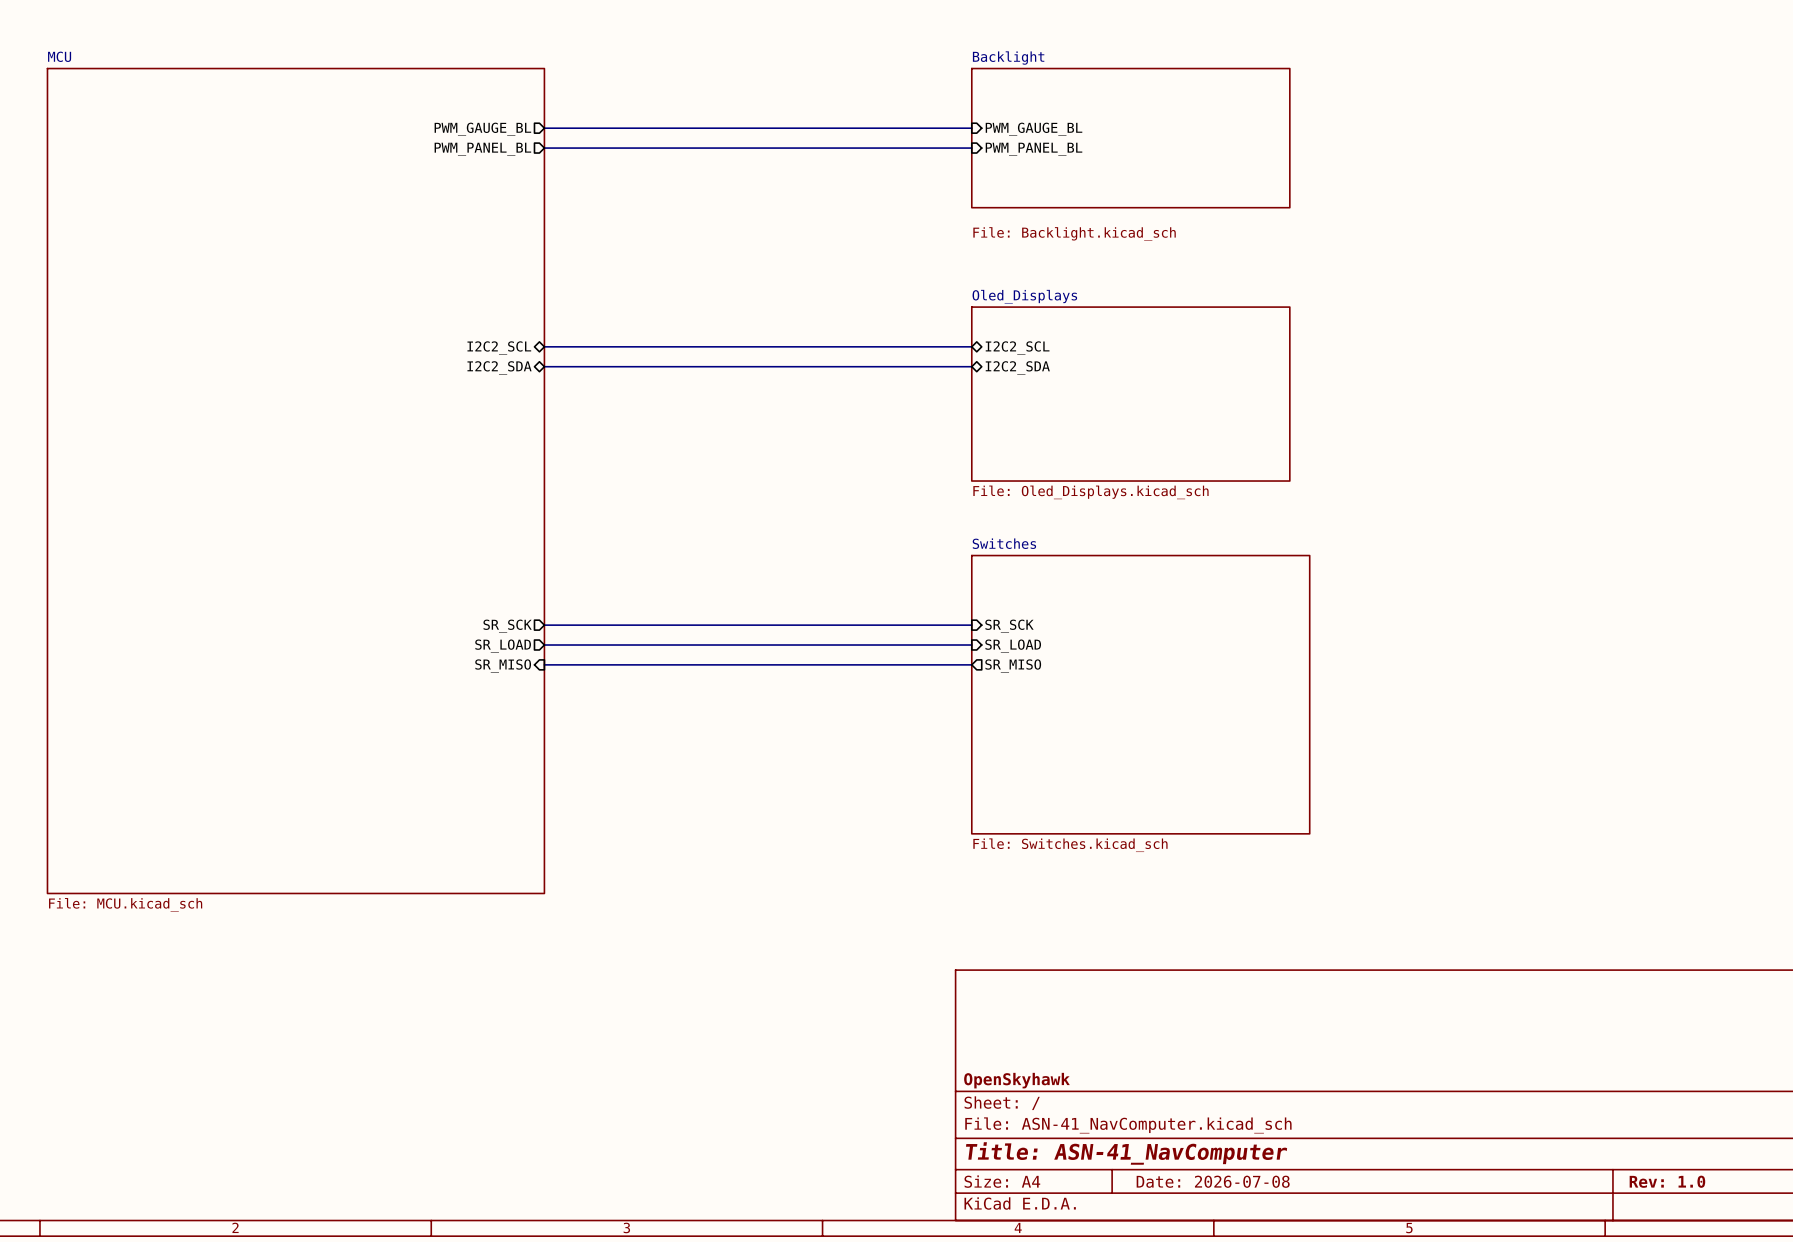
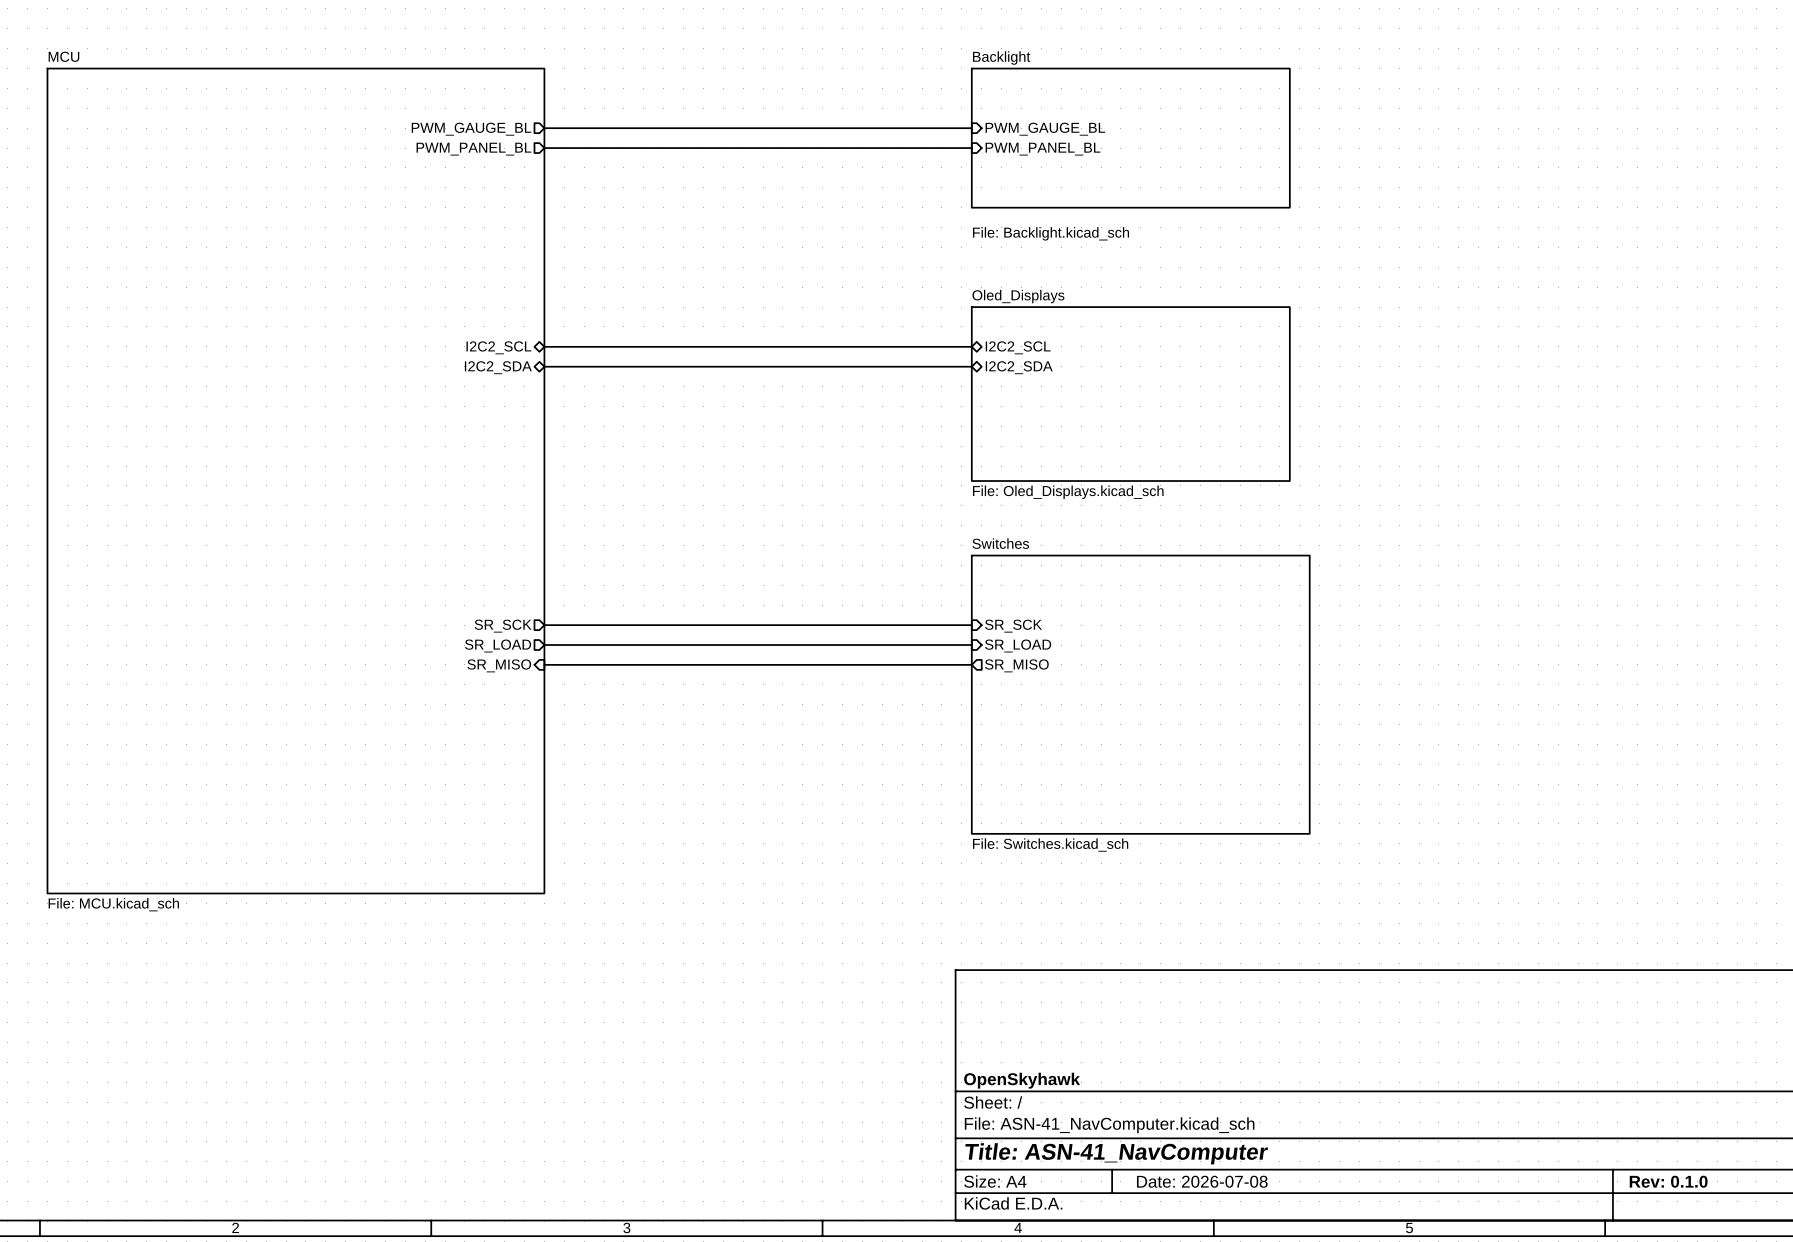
title block: Rev: 1.0 (1667, 1181) -> Rev: 0.1.0 (1668, 1181)

